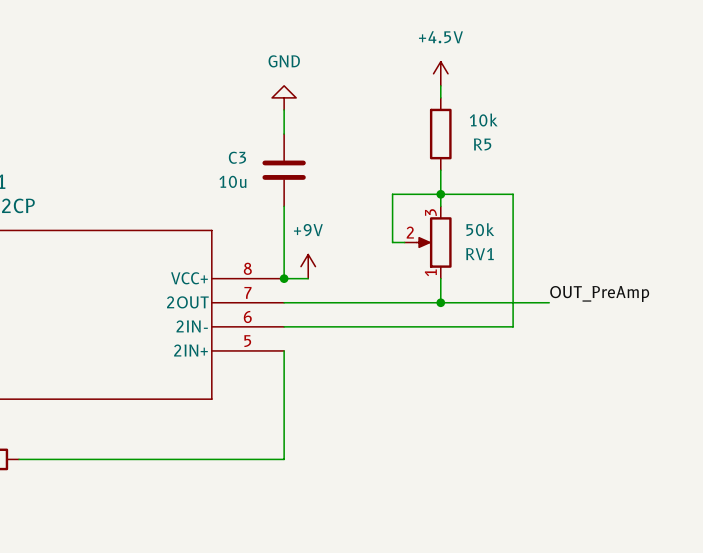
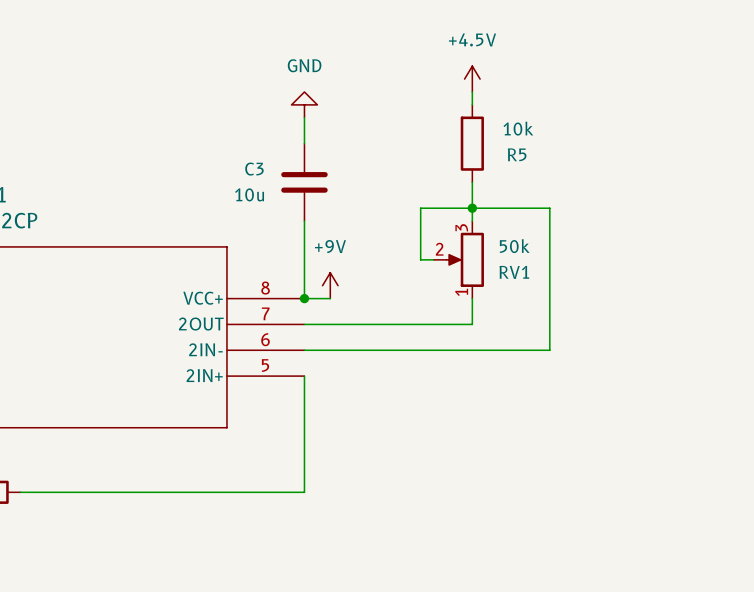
label: OUT_PreAmp (599, 293) -> none
wire: (440, 302) (549, 302) -> none
junction: (440, 302) -> none

